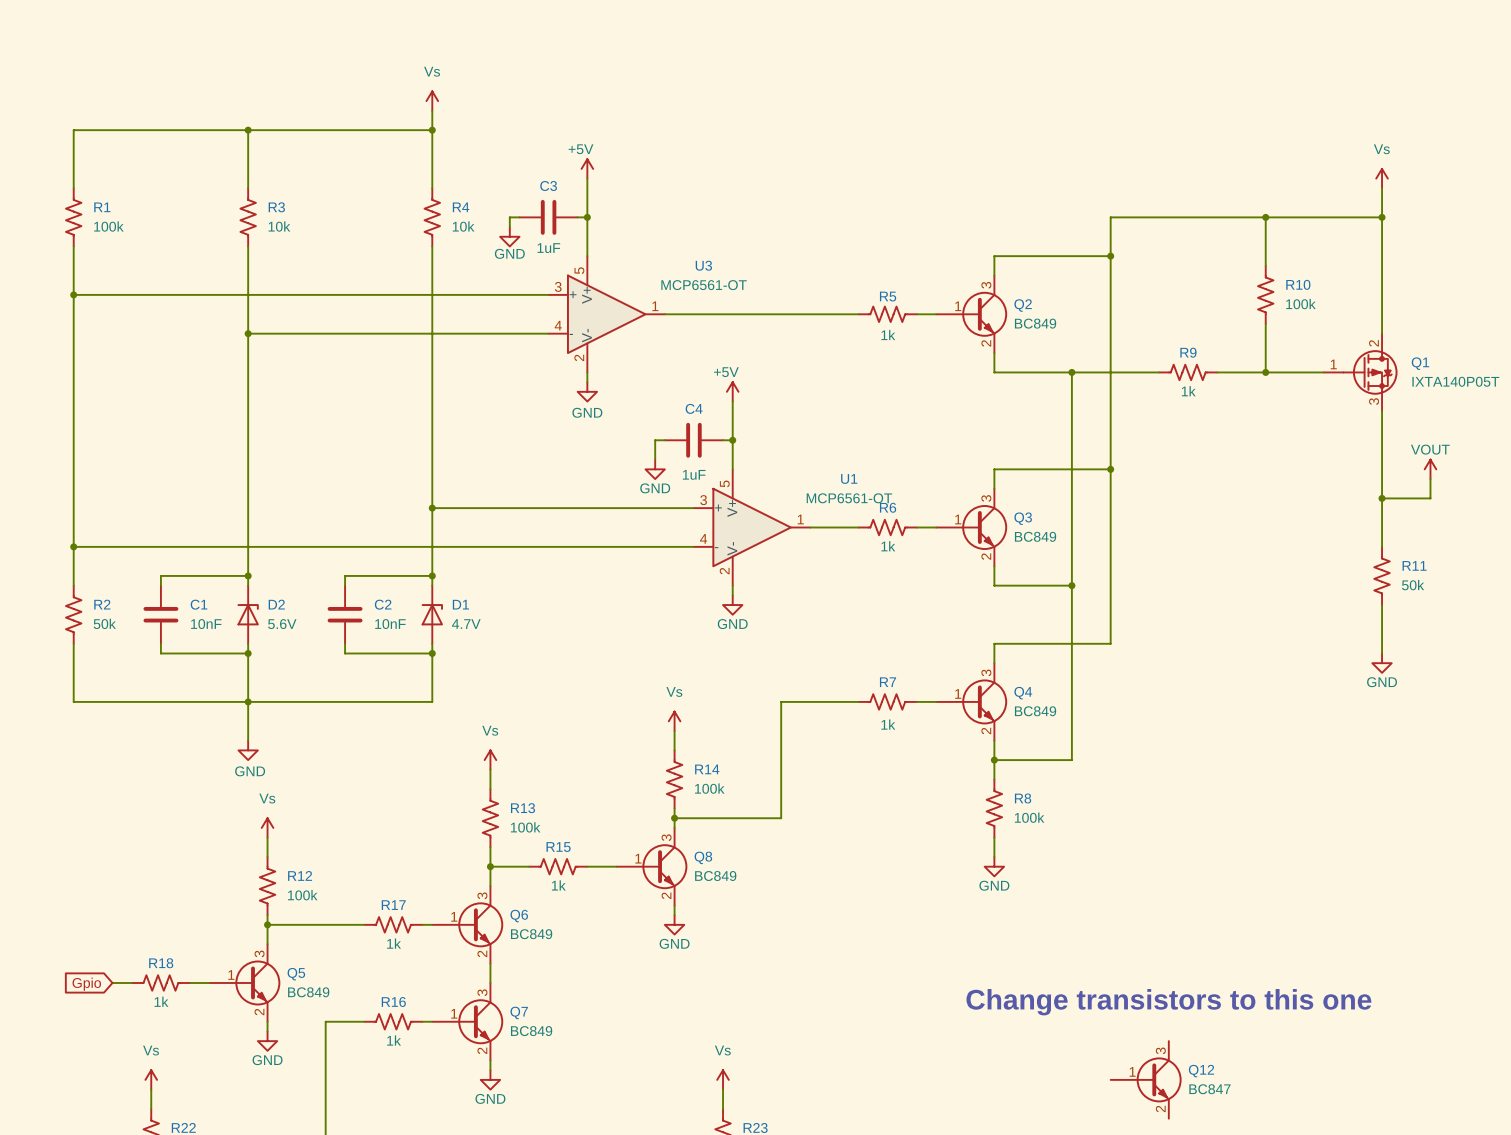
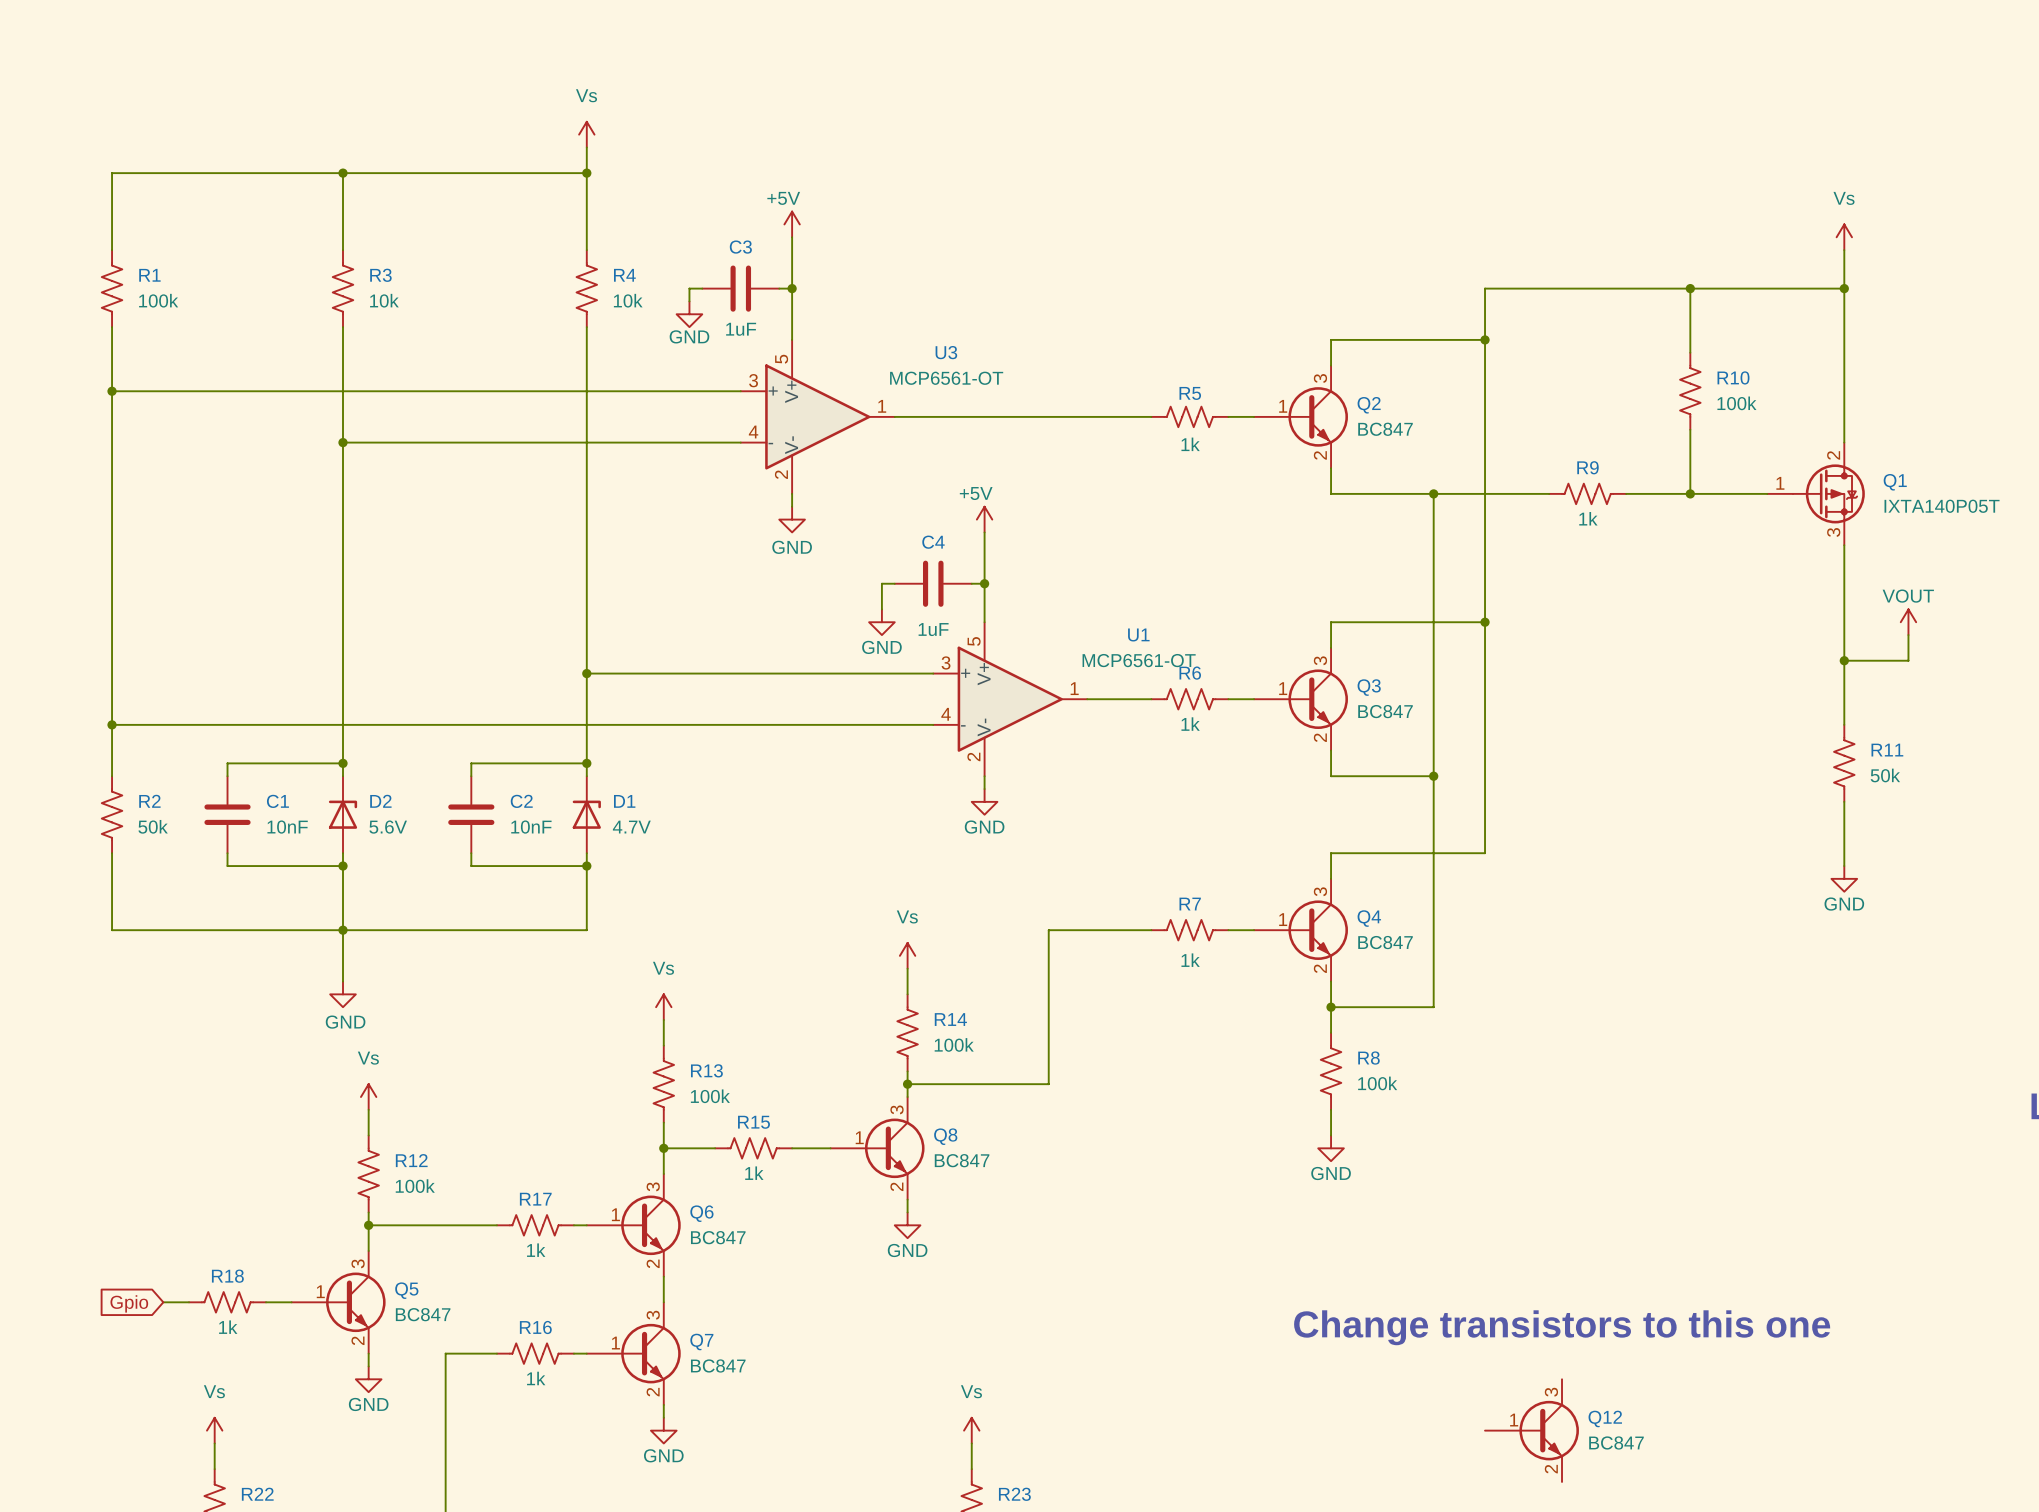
Q2 value: BC849 (1035, 323) -> BC847 (1385, 429)
Q3 value: BC849 (1035, 536) -> BC847 (1385, 711)
Q4 value: BC849 (1035, 711) -> BC847 (1385, 942)
Q8 value: BC849 (715, 876) -> BC847 (962, 1160)
Q6 value: BC849 (531, 934) -> BC847 (718, 1237)
Q5 value: BC849 (308, 992) -> BC847 (423, 1314)
Q7 value: BC849 (531, 1031) -> BC847 (718, 1365)

